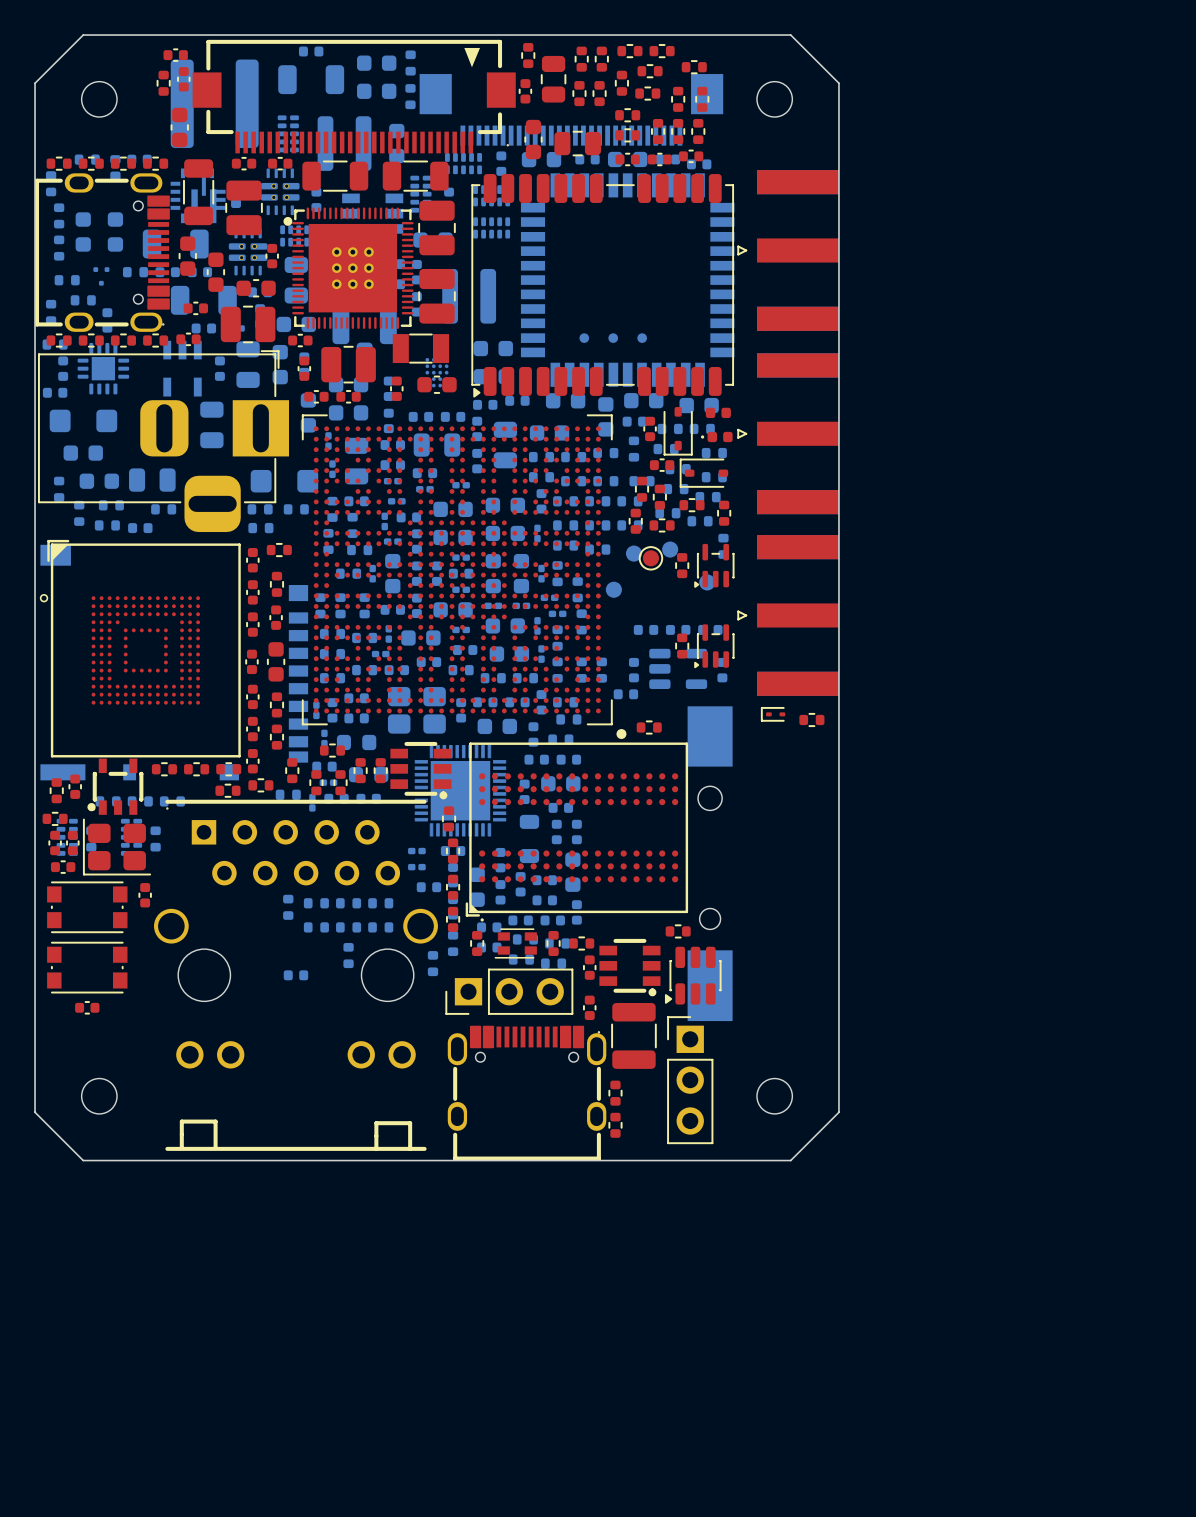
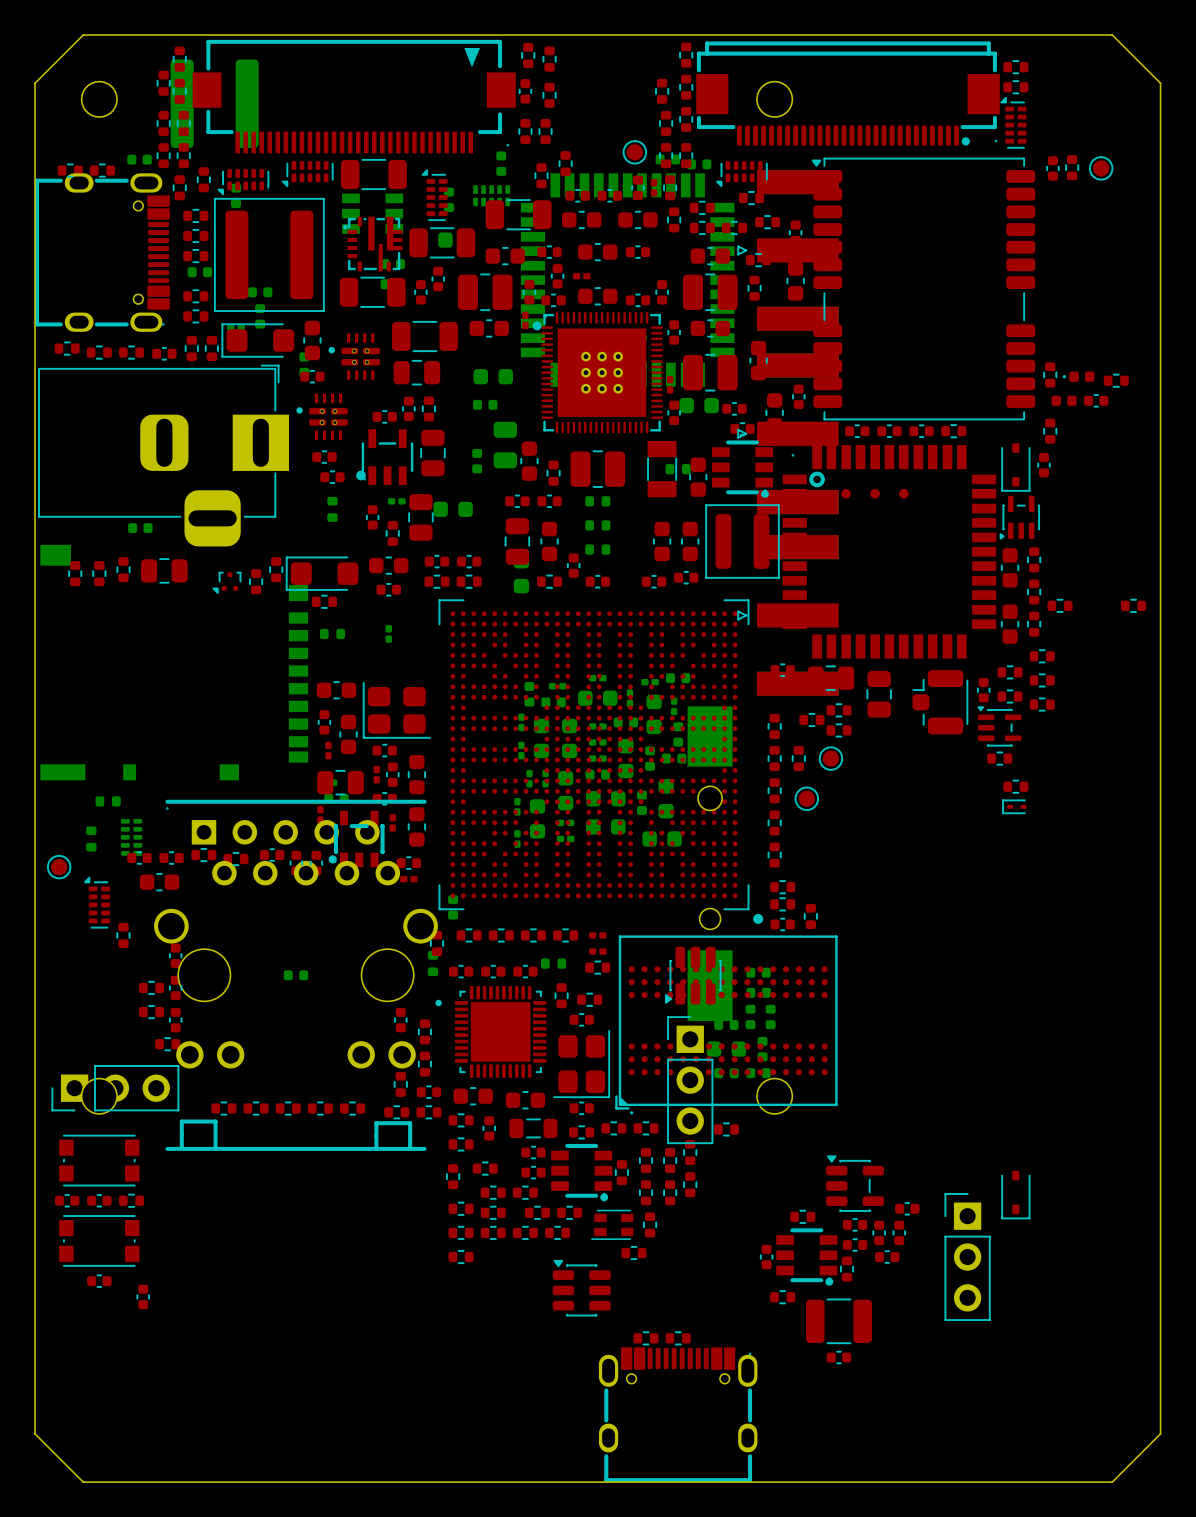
board edge: (790, 35) (838, 83) (838, 1112) (790, 1160) (83, 1160) (35, 1112) -> (790, 35) (1112, 35) (1160, 83) (1160, 1433) (1112, 1482) (83, 1482) (35, 1433) (35, 1112)
part footprint: [163, 48, 188, 62] -> [172, 46, 187, 72]
part side: bottom (311, 51) -> top (438, 279)
part: (629, 51) -> none
part: (662, 51) -> none
part: none -> (686, 55)
part: none -> (549, 59)
part: (581, 59) -> none
part: (601, 59) -> none
part: (376, 63) -> none
part: (410, 63) -> none
part: (694, 67) -> none
part: none -> (1015, 67)
part: (650, 71) -> none
part: (183, 79) -> none
part side: bottom (311, 79) -> top (373, 174)
part: (553, 79) -> none
part: (621, 83) -> none
part: none -> (686, 87)
part: none -> (1015, 87)
part: none -> (179, 91)
part: (376, 91) -> none
part: (579, 93) -> none
part: (599, 93) -> none
part: (647, 93) -> none
part: none -> (549, 95)
part: (410, 96) -> none
part: (678, 99) -> none
part: (702, 99) -> none
part footprint: [170, 107, 189, 148] -> [176, 110, 191, 137]
part side: bottom (571, 109) -> top (847, 93)
part: (627, 115) -> none
part: none -> (686, 119)
part: none -> (1013, 122)
part: none -> (163, 123)
part: none -> (525, 131)
part: none -> (545, 131)
part: (658, 131) -> none
part: (678, 131) -> none
part: (698, 131) -> none
part side: bottom (288, 133) -> top (307, 174)
part: (627, 135) -> none
part: (533, 139) -> none
part: (344, 143) -> none
part: (396, 143) -> none
part: (577, 143) -> none
part footprint: [678, 149, 704, 164] -> [679, 143, 694, 169]
part: none -> (634, 152)
part footprint: [647, 152, 673, 167] -> [659, 143, 674, 169]
part: (87, 159) -> none
part: (541, 159) -> none
part: (587, 159) -> none
part: (627, 159) -> none
part: (627, 159) -> none
part: (59, 163) -> none
part: (91, 163) -> none
part: (123, 163) -> none
part rotation: 0° (155, 163) -> 90° clockwise (163, 155)
part: (244, 163) -> none
part: (280, 163) -> none
part side: bottom (463, 163) -> top (741, 174)
part: (115, 167) -> none
part: none -> (1072, 167)
part: none -> (1052, 168)
part: none -> (1101, 168)
part: none -> (70, 170)
part: none -> (102, 170)
part: none -> (541, 175)
part: (335, 176) -> none
part: (415, 176) -> none
part: none -> (203, 179)
part: (51, 183) -> none
part: none -> (670, 187)
part side: bottom (280, 191) -> top (322, 416)
part: (198, 192) -> none
part side: bottom (420, 194) -> top (434, 195)
part side: bottom (198, 195) -> top (372, 244)
part: none -> (577, 195)
part: none -> (751, 198)
part side: bottom (316, 199) -> top (324, 457)
part footprint: [418, 200, 456, 256] -> [409, 227, 476, 259]
part: (244, 207) -> none
part: none -> (702, 207)
part: none -> (518, 214)
part: (59, 215) -> none
part: none -> (195, 215)
part: none -> (581, 219)
part: none -> (637, 219)
part: none -> (674, 219)
part: none -> (767, 222)
part: (491, 227) -> none
part: none -> (702, 227)
part: (83, 231) -> none
part: (115, 231) -> none
part: none -> (795, 232)
part side: bottom (298, 235) -> top (243, 182)
part footprint: [178, 236, 197, 276] -> [183, 249, 209, 264]
part footprint: [265, 243, 279, 269] -> [213, 197, 325, 312]
part side: bottom (175, 244) -> top (372, 292)
part: (59, 248) -> none
part: (248, 252) -> none
part: none -> (549, 252)
part: none -> (637, 252)
part: none -> (505, 256)
part: none -> (710, 256)
part: none -> (758, 260)
part position: (348, 268) -> (597, 372)
part: (135, 272) -> none
part: (167, 272) -> none
part: (215, 272) -> none
part: (416, 272) -> none
part side: bottom (101, 276) -> top (226, 582)
part: none -> (557, 276)
part: (67, 280) -> none
part side: bottom (296, 280) -> top (416, 372)
part: none -> (795, 280)
part rotation: 0° (602, 285) -> 90° clockwise (923, 288)
part position: (602, 285) -> (923, 288)
part: (256, 288) -> none
part: none -> (754, 288)
part: none -> (529, 292)
part: none -> (662, 292)
part: none -> (710, 292)
part: none -> (195, 296)
part rotation: 0° (437, 296) -> 90° clockwise (485, 292)
part position: (437, 296) -> (485, 292)
part: (469, 296) -> none
part: (83, 300) -> none
part side: bottom (203, 300) -> top (424, 336)
part: none -> (637, 300)
part side: bottom (416, 304) -> top (553, 300)
part position: (195, 308) -> (164, 353)
part side: bottom (51, 312) -> top (195, 236)
part: none -> (195, 316)
part side: bottom (107, 320) -> top (372, 517)
part: (248, 324) -> none
part side: bottom (296, 324) -> top (597, 296)
part side: bottom (203, 328) -> top (420, 292)
part: none -> (489, 328)
part footprint: [176, 332, 201, 347] -> [184, 336, 199, 362]
part: none -> (674, 332)
part: (364, 334) -> none
part: (59, 340) -> none
part: (91, 340) -> none
part: (123, 340) -> none
part: (155, 340) -> none
part: (300, 340) -> none
part side: bottom (55, 344) -> top (99, 573)
part footprint: [321, 345, 376, 384] -> [328, 333, 380, 380]
part: none -> (211, 348)
part: (420, 348) -> none
part side: bottom (493, 348) -> top (710, 328)
part: none -> (758, 360)
part: (248, 364) -> none
part side: bottom (280, 364) -> top (529, 461)
part side: bottom (63, 368) -> top (332, 477)
part: (103, 368) -> none
part side: bottom (182, 368) -> top (384, 457)
part: (219, 368) -> none
part: (304, 368) -> none
part: (437, 372) -> none
part: none -> (710, 372)
part: none -> (1050, 374)
part: none -> (1116, 380)
part: (348, 384) -> none
part: (437, 384) -> none
part side: bottom (388, 388) -> top (674, 412)
part position: (396, 388) -> (408, 408)
part side: bottom (55, 392) -> top (312, 376)
part: (316, 396) -> none
part: (348, 396) -> none
part: none -> (798, 396)
part side: bottom (517, 400) -> top (388, 589)
part: (565, 400) -> none
part: (643, 400) -> none
part: none -> (1096, 400)
part: none -> (428, 408)
part side: bottom (308, 412) -> top (597, 252)
part: (348, 412) -> none
part position: (718, 412) -> (1064, 400)
part: none -> (774, 412)
part side: bottom (420, 416) -> top (734, 408)
part: (453, 416) -> none
part: (605, 416) -> none
part side: bottom (83, 420) -> top (257, 340)
part side: bottom (388, 420) -> top (384, 416)
part: (634, 421) -> none
part: (211, 424) -> none
part side: bottom (477, 428) -> top (517, 501)
part: (650, 428) -> none
part: (670, 428) -> none
part: (702, 428) -> none
part: none -> (742, 428)
part position: (678, 431) -> (1015, 467)
part: none -> (857, 431)
part: none -> (889, 431)
part: none -> (921, 431)
part: none -> (953, 431)
part: none -> (1050, 431)
part side: bottom (549, 432) -> top (388, 565)
part position: (716, 437) -> (1078, 376)
part position: (163, 441) -> (163, 455)
part side: bottom (328, 441) -> top (525, 320)
part side: bottom (392, 445) -> top (469, 561)
part side: bottom (437, 445) -> top (432, 453)
part: (633, 449) -> none
part side: bottom (666, 449) -> top (565, 163)
part side: bottom (83, 453) -> top (312, 340)
part side: bottom (605, 453) -> top (734, 227)
part side: bottom (714, 453) -> top (666, 123)
part: (541, 457) -> none
part: (573, 457) -> none
part footprint: [649, 458, 675, 472] -> [647, 441, 678, 498]
part footprint: [679, 458, 729, 488] -> [689, 457, 708, 497]
part: (356, 461) -> none
part side: bottom (392, 465) -> top (609, 195)
part: none -> (1043, 465)
part side: bottom (332, 469) -> top (670, 384)
part: none -> (597, 469)
part: none -> (742, 469)
part side: bottom (424, 473) -> top (637, 187)
part: none -> (553, 473)
part side: bottom (541, 477) -> top (256, 581)
part side: bottom (714, 477) -> top (662, 91)
part side: bottom (152, 480) -> top (164, 570)
part: (99, 481) -> none
part side: bottom (284, 481) -> top (322, 573)
part side: bottom (392, 481) -> top (581, 276)
part: (573, 481) -> none
part side: bottom (605, 481) -> top (774, 822)
part: (642, 481) -> none
part: (461, 485) -> none
part side: bottom (59, 489) -> top (131, 352)
part side: bottom (424, 489) -> top (654, 187)
part: (642, 489) -> none
part side: bottom (675, 489) -> top (1010, 672)
part: (659, 497) -> none
part side: bottom (708, 497) -> top (1034, 592)
part: (356, 501) -> none
part: (541, 501) -> none
part: none -> (549, 501)
part side: bottom (565, 501) -> top (469, 581)
part: (629, 501) -> none
part side: bottom (111, 505) -> top (67, 348)
part: (505, 505) -> none
part: (692, 505) -> none
part side: bottom (163, 509) -> top (179, 187)
part: (260, 509) -> none
part: (296, 509) -> none
part side: bottom (79, 513) -> top (99, 352)
part side: bottom (667, 513) -> top (1042, 656)
part: (724, 513) -> none
part: (408, 517) -> none
part: none -> (420, 517)
part: none -> (1019, 517)
part: (384, 521) -> none
part: (635, 521) -> none
part side: bottom (700, 521) -> top (1042, 704)
part side: bottom (107, 525) -> top (183, 155)
part: (352, 525) -> none
part side: bottom (565, 525) -> top (437, 581)
part: (629, 525) -> none
part: (662, 525) -> none
part: (260, 528) -> none
part: none -> (392, 533)
part: (505, 533) -> none
part: (537, 533) -> none
part: (453, 537) -> none
part side: bottom (328, 541) -> top (236, 859)
part: (392, 541) -> none
part: (416, 541) -> none
part: none -> (517, 541)
part: none -> (549, 541)
part: none -> (662, 541)
part: none -> (690, 541)
part: none -> (742, 541)
part: (565, 545) -> none
part: (723, 546) -> none
part side: bottom (670, 549) -> top (806, 798)
part: (279, 550) -> none
part: (359, 550) -> none
part: none -> (889, 551)
part: (633, 553) -> none
part: (461, 557) -> none
part: (650, 558) -> none
part: none -> (1034, 559)
part: (252, 560) -> none
part: none -> (437, 561)
part: none -> (573, 565)
part: (682, 565) -> none
part: (714, 565) -> none
part: none -> (1010, 567)
part: none -> (123, 569)
part: none -> (276, 569)
part: none -> (75, 573)
part: (348, 573) -> none
part: (372, 573) -> none
part: (392, 573) -> none
part: (416, 573) -> none
part: (437, 573) -> none
part side: bottom (461, 573) -> top (597, 581)
part: (493, 573) -> none
part: (541, 573) -> none
part: (557, 573) -> none
part position: (464, 576) -> (600, 761)
part: none -> (686, 577)
part: none -> (654, 581)
part: (707, 582) -> none
part: (276, 584) -> none
part: (461, 589) -> none
part: (577, 589) -> none
part side: bottom (613, 589) -> top (830, 758)
part: (252, 592) -> none
part side: bottom (549, 597) -> top (597, 935)
part side: bottom (320, 605) -> top (324, 601)
part side: bottom (340, 605) -> top (437, 943)
part: (364, 605) -> none
part: (416, 605) -> none
part: (493, 605) -> none
part: (521, 605) -> none
part: none -> (1060, 605)
part: none -> (1133, 605)
part: (392, 609) -> none
part: (453, 609) -> none
part side: bottom (557, 613) -> top (597, 951)
part: (276, 617) -> none
part side: bottom (581, 621) -> top (798, 758)
part: (252, 624) -> none
part: none -> (1010, 624)
part: none -> (1034, 624)
part: (505, 625) -> none
part: (537, 625) -> none
part: (461, 629) -> none
part: (646, 629) -> none
part: (678, 629) -> none
part: (710, 629) -> none
part side: bottom (364, 637) -> top (565, 935)
part: (420, 637) -> none
part side: bottom (557, 637) -> top (774, 790)
part: (682, 646) -> none
part: (714, 646) -> none
part: (140, 648) -> none
part footprint: [649, 648, 708, 689] -> [665, 673, 691, 684]
part: (465, 650) -> none
part: (332, 654) -> none
part: (380, 654) -> none
part: (509, 654) -> none
part: (541, 654) -> none
part: (251, 661) -> none
part: (276, 661) -> none
part: (428, 662) -> none
part: (364, 670) -> none
part side: bottom (396, 670) -> top (581, 1019)
part side: bottom (461, 670) -> top (549, 581)
part side: bottom (557, 670) -> top (501, 935)
part: (581, 670) -> none
part: (601, 670) -> none
part: (633, 670) -> none
part: (722, 670) -> none
part: none -> (782, 670)
part: (332, 678) -> none
part side: bottom (493, 678) -> top (774, 855)
part side: bottom (525, 678) -> top (469, 935)
part: none -> (597, 678)
part: none -> (830, 678)
part: none -> (1042, 680)
part: none -> (650, 682)
part: none -> (557, 686)
part footprint: [613, 689, 639, 700] -> [626, 689, 634, 708]
part: none -> (336, 690)
part: none -> (983, 690)
part: none -> (529, 694)
part: none -> (879, 694)
part: (252, 696) -> none
part: none -> (1010, 696)
part side: bottom (356, 698) -> top (296, 863)
part: none -> (597, 698)
part side: bottom (485, 702) -> top (525, 971)
part: (517, 702) -> none
part: (541, 702) -> none
part: none -> (553, 702)
part: (565, 702) -> none
part: none -> (940, 702)
part: (276, 704) -> none
part: none -> (674, 706)
part footprint: [760, 706, 786, 722] -> [767, 713, 782, 739]
part side: bottom (316, 710) -> top (408, 879)
part side: bottom (332, 710) -> top (408, 863)
part side: bottom (416, 710) -> top (581, 1064)
part: (461, 710) -> none
part: none -> (838, 710)
part: none -> (654, 714)
part side: bottom (356, 718) -> top (392, 774)
part side: bottom (568, 719) -> top (810, 916)
part: none -> (324, 722)
part: none -> (521, 722)
part: none -> (625, 722)
part side: bottom (497, 726) -> top (473, 1096)
part: none -> (597, 726)
part: none -> (999, 726)
part: (649, 727) -> none
part: (252, 729) -> none
part: none -> (838, 730)
part: none -> (348, 734)
part side: bottom (533, 734) -> top (461, 971)
part footprint: [548, 734, 574, 745] -> [562, 718, 578, 759]
part: none -> (678, 734)
part: (276, 737) -> none
part side: bottom (324, 738) -> top (376, 774)
part: none -> (541, 738)
part footprint: [390, 741, 452, 800] -> [407, 754, 427, 795]
part: (356, 742) -> none
part: none -> (597, 742)
part footprint: [319, 743, 346, 758] -> [325, 741, 332, 760]
part: none -> (384, 750)
part: none -> (521, 750)
part: none -> (597, 758)
part: none -> (625, 758)
part: none -> (650, 758)
part: none -> (674, 758)
part: none -> (774, 758)
part: none -> (999, 758)
part: (536, 759) -> none
part: (568, 759) -> none
part: (252, 761) -> none
part side: bottom (324, 766) -> top (272, 855)
part: (164, 769) -> none
part: (196, 769) -> none
part: (228, 769) -> none
part: (292, 770) -> none
part footprint: [333, 770, 348, 796] -> [317, 769, 364, 796]
part: (360, 770) -> none
part: (380, 770) -> none
part side: bottom (368, 774) -> top (416, 826)
part: none -> (597, 774)
part: none -> (529, 778)
part: none -> (545, 778)
part: (316, 782) -> none
part rotation: 0° (560, 783) -> 90° clockwise (565, 790)
part: (260, 785) -> none
part: (75, 786) -> none
part position: (115, 786) -> (356, 838)
part: none -> (1015, 786)
part: (56, 790) -> none
part: (227, 790) -> none
part side: bottom (460, 790) -> top (490, 1031)
part: (524, 791) -> none
part: (288, 794) -> none
part side: bottom (368, 798) -> top (384, 798)
part: none -> (605, 798)
part: none -> (666, 798)
part side: bottom (140, 801) -> top (151, 987)
part side: bottom (172, 801) -> top (151, 1012)
part side: bottom (312, 802) -> top (320, 814)
part: none -> (642, 802)
part: none -> (517, 806)
part: none -> (1014, 806)
part side: bottom (560, 807) -> top (782, 924)
part: (55, 818) -> none
part: (449, 818) -> none
part: none -> (537, 818)
part: none -> (565, 822)
part: none -> (605, 826)
part: (556, 832) -> none
part position: (576, 832) -> (726, 1024)
part: (576, 832) -> none
part: (67, 837) -> none
part side: bottom (155, 838) -> top (123, 935)
part: none -> (517, 838)
part side: bottom (529, 838) -> top (533, 1128)
part: none -> (565, 838)
part: none -> (662, 838)
part: (55, 842) -> none
part: (72, 842) -> none
part position: (117, 847) -> (396, 710)
part side: bottom (416, 851) -> top (392, 822)
part side: bottom (453, 851) -> top (493, 971)
part: (453, 851) -> none
part: none -> (203, 855)
part: none -> (139, 858)
part: none -> (171, 858)
part footprint: [50, 860, 76, 874] -> [46, 854, 72, 880]
part: (500, 860) -> none
part: none -> (316, 863)
part: (416, 867) -> none
part: (572, 872) -> none
part side: bottom (453, 875) -> top (533, 1152)
part: (544, 880) -> none
part footprint: [47, 881, 128, 934] -> [83, 876, 110, 929]
part: none -> (159, 882)
part: (520, 884) -> none
part side: bottom (428, 887) -> top (428, 1092)
part: (453, 887) -> none
part: (477, 887) -> none
part: none -> (782, 887)
part: (500, 892) -> none
part: (145, 895) -> none
part: (544, 900) -> none
part side: bottom (316, 903) -> top (493, 1192)
part side: bottom (348, 903) -> top (589, 999)
part side: bottom (380, 903) -> top (428, 1112)
part: none -> (782, 904)
part side: bottom (288, 907) -> top (493, 1212)
part: (576, 912) -> none
part: (453, 919) -> none
part: (520, 920) -> none
part: (552, 920) -> none
part: (316, 927) -> none
part side: bottom (348, 927) -> top (646, 1160)
part side: bottom (380, 927) -> top (646, 1128)
part side: bottom (489, 927) -> top (533, 1172)
part: (678, 931) -> none
part side: bottom (525, 939) -> top (533, 935)
part side: bottom (453, 943) -> top (461, 1208)
part: (477, 943) -> none
part position: (515, 943) -> (612, 1224)
part: (553, 943) -> none
part side: bottom (557, 943) -> top (670, 1192)
part: (581, 943) -> none
part side: bottom (489, 947) -> top (489, 1128)
part: none -> (175, 955)
part side: bottom (348, 955) -> top (690, 1152)
part footprint: [582, 955, 597, 980] -> [585, 960, 611, 975]
part side: bottom (521, 959) -> top (633, 1253)
part: (87, 967) -> none
part: (629, 967) -> none
part: none -> (758, 972)
part: none -> (175, 987)
part: (509, 991) -> none
part: none -> (758, 992)
part: none -> (561, 995)
part: (87, 1007) -> none
part: (589, 1007) -> none
part: none -> (750, 1016)
part: none -> (770, 1016)
part: none -> (175, 1020)
part: none -> (400, 1020)
part: none -> (726, 1024)
part footprint: [447, 1025, 607, 1161] -> [505, 1091, 546, 1110]
part: none -> (424, 1031)
part rotation: 0° (633, 1035) -> 90° clockwise (838, 1321)
part position: (633, 1035) -> (838, 1321)
part: none -> (167, 1044)
part: none -> (726, 1049)
part: none -> (762, 1049)
part: none -> (424, 1064)
part: none -> (726, 1073)
part: none -> (758, 1073)
part: none -> (400, 1084)
part: none -> (115, 1088)
part: (615, 1093) -> none
part: none -> (223, 1108)
part: none -> (256, 1108)
part: none -> (288, 1108)
part: none -> (320, 1108)
part: none -> (352, 1108)
part: none -> (581, 1108)
part: none -> (396, 1112)
part: none -> (461, 1120)
part rotation: 0° (615, 1125) -> 90° clockwise (613, 1128)
part: none -> (726, 1129)
part: none -> (581, 1132)
part: none -> (461, 1144)
part: none -> (99, 1160)
part: none -> (670, 1160)
part: none -> (485, 1168)
part: none -> (581, 1172)
part: none -> (621, 1172)
part: none -> (453, 1176)
part: none -> (855, 1183)
part: none -> (690, 1184)
part: none -> (525, 1192)
part: none -> (646, 1192)
part: none -> (1015, 1195)
part: none -> (67, 1200)
part: none -> (99, 1200)
part: none -> (131, 1200)
part: none -> (907, 1208)
part: none -> (537, 1212)
part: none -> (569, 1212)
part: none -> (802, 1216)
part: none -> (650, 1224)
part: none -> (855, 1224)
part: none -> (461, 1232)
part: none -> (493, 1232)
part: none -> (525, 1232)
part: none -> (557, 1232)
part: none -> (879, 1232)
part: none -> (899, 1232)
part: none -> (99, 1240)
part: none -> (855, 1244)
part: none -> (461, 1257)
part: none -> (766, 1257)
part: none -> (806, 1257)
part: none -> (887, 1257)
part: none -> (967, 1257)
part: none -> (847, 1269)
part: none -> (99, 1281)
part: none -> (581, 1288)
part: none -> (143, 1296)
part: none -> (782, 1297)
part: none -> (646, 1338)
part: none -> (678, 1338)
part: none -> (838, 1357)
part: none -> (678, 1414)

